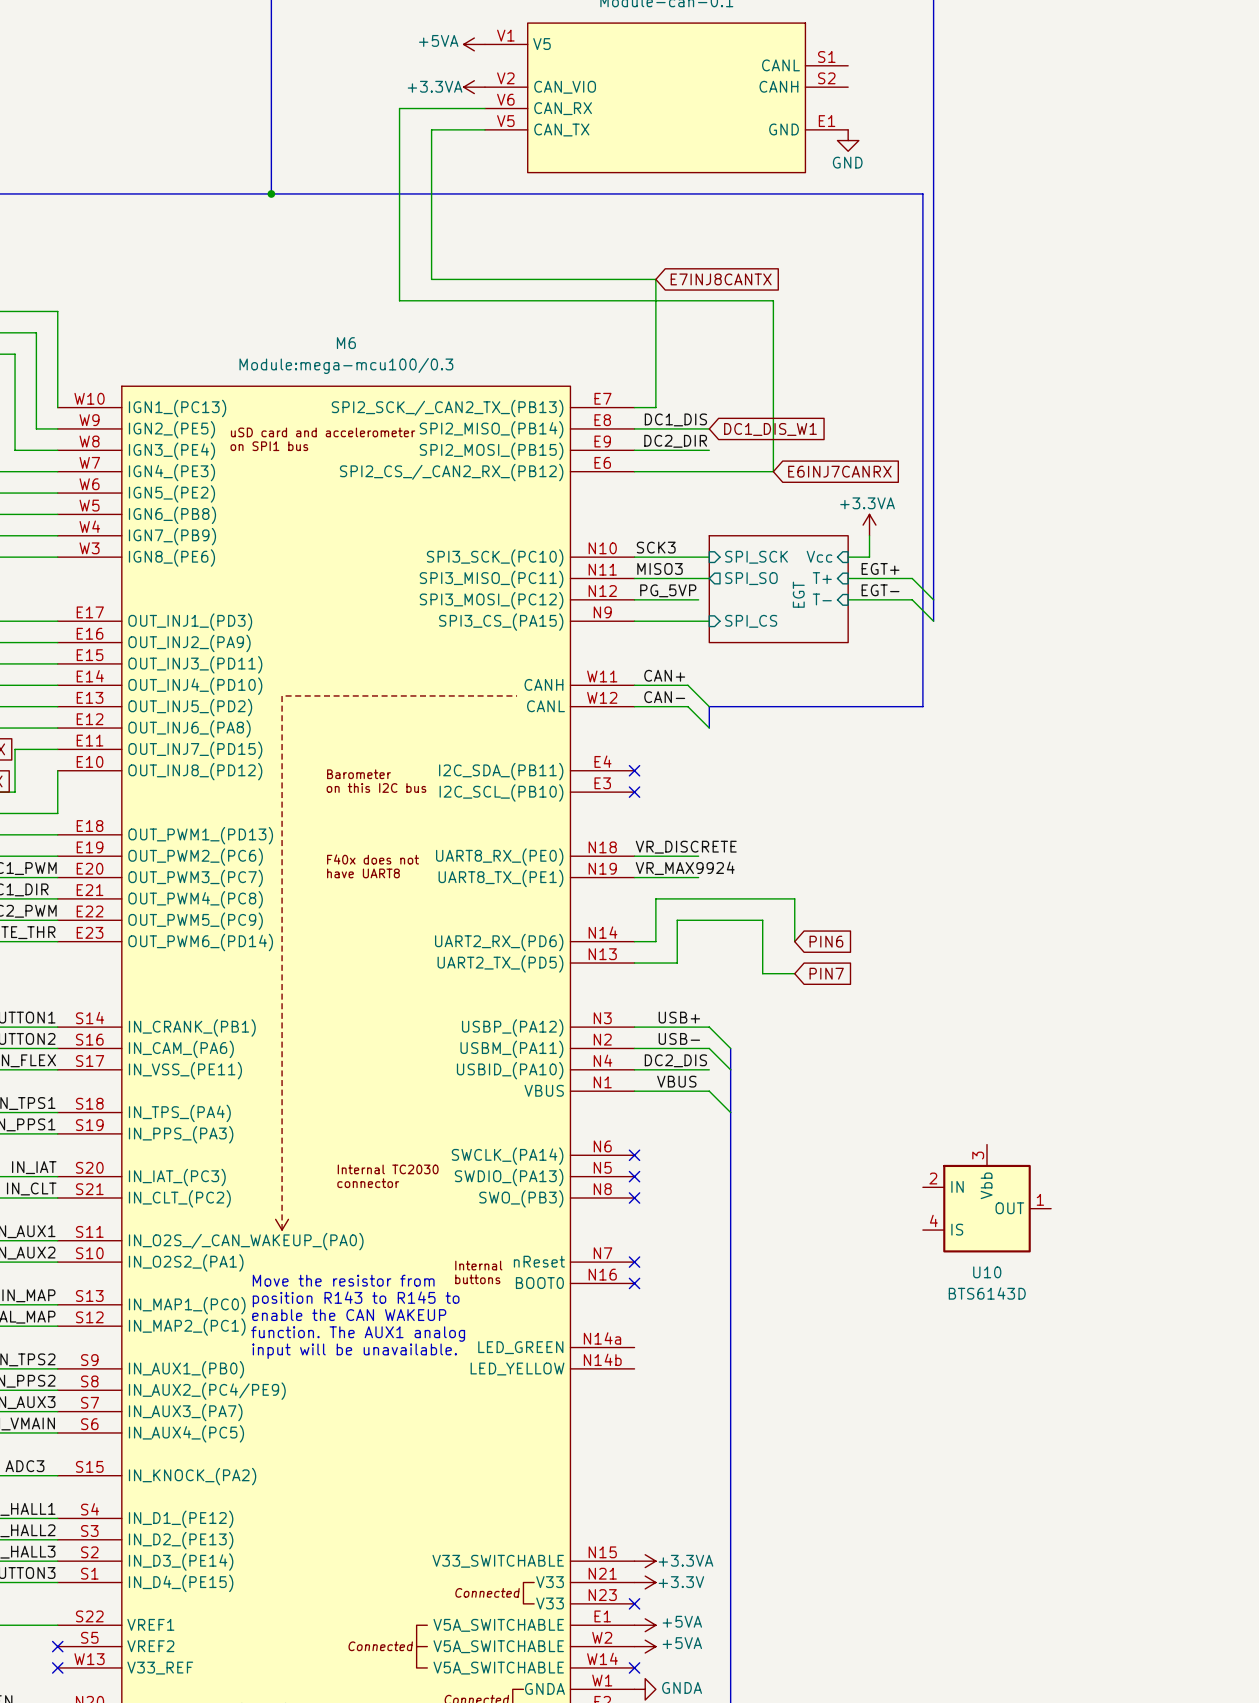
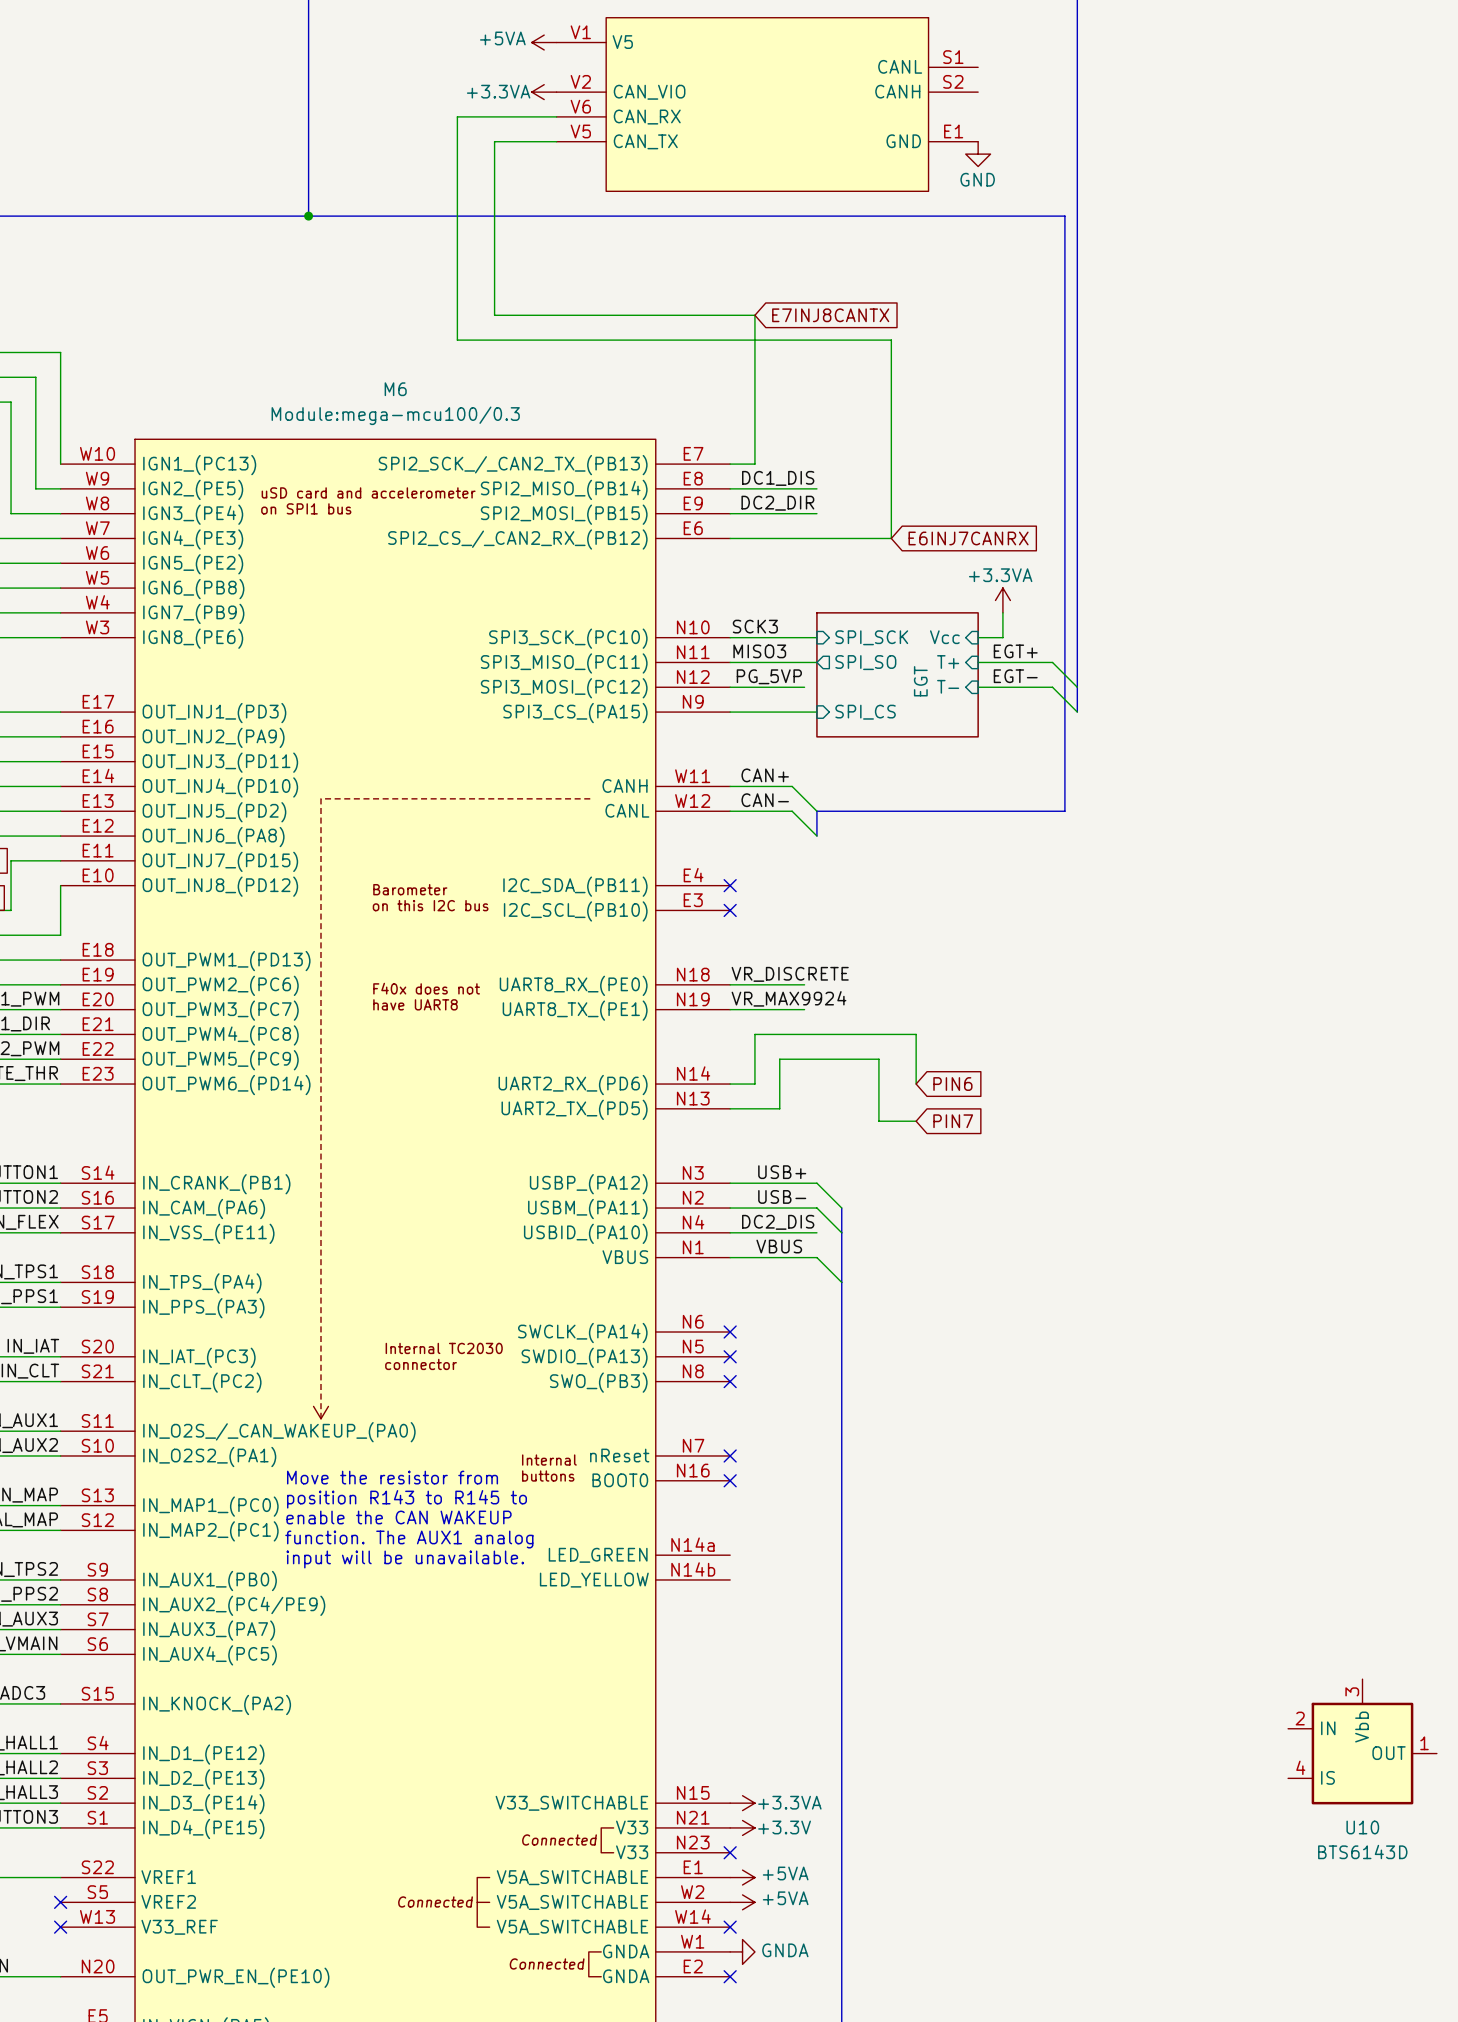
global label: DC1_DIS_W1 (770, 429) -> none
U10 position: (987, 1198) -> (1362, 1741)

